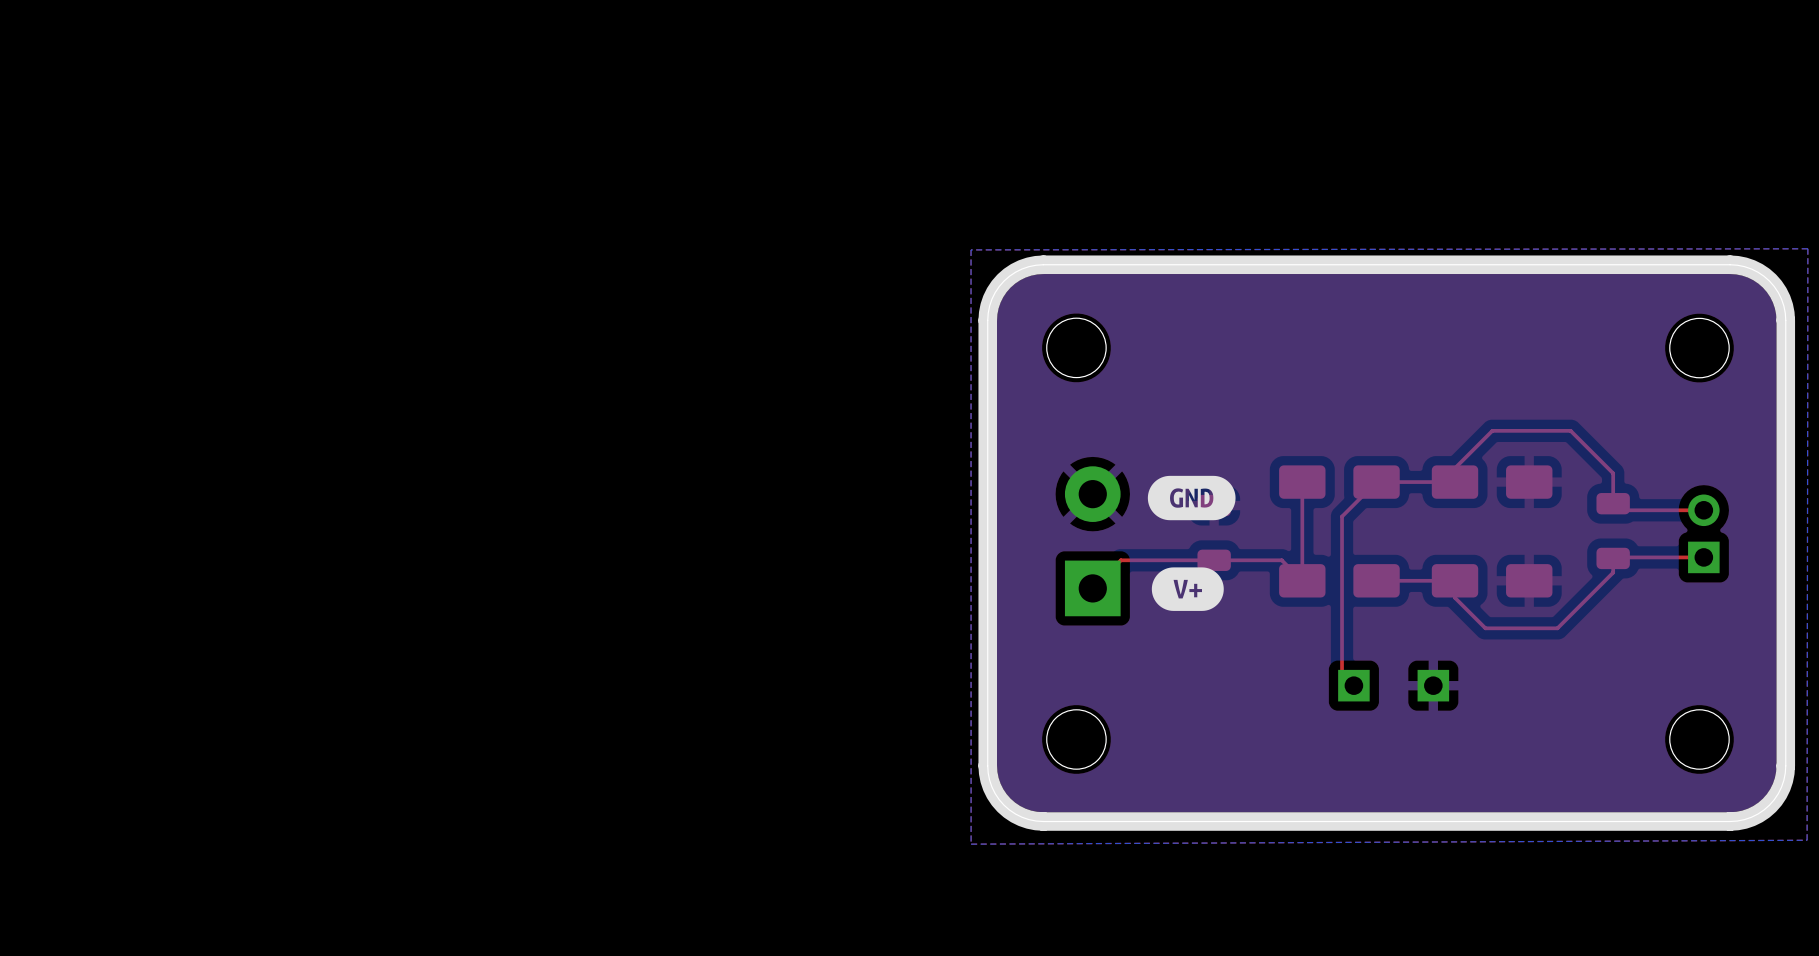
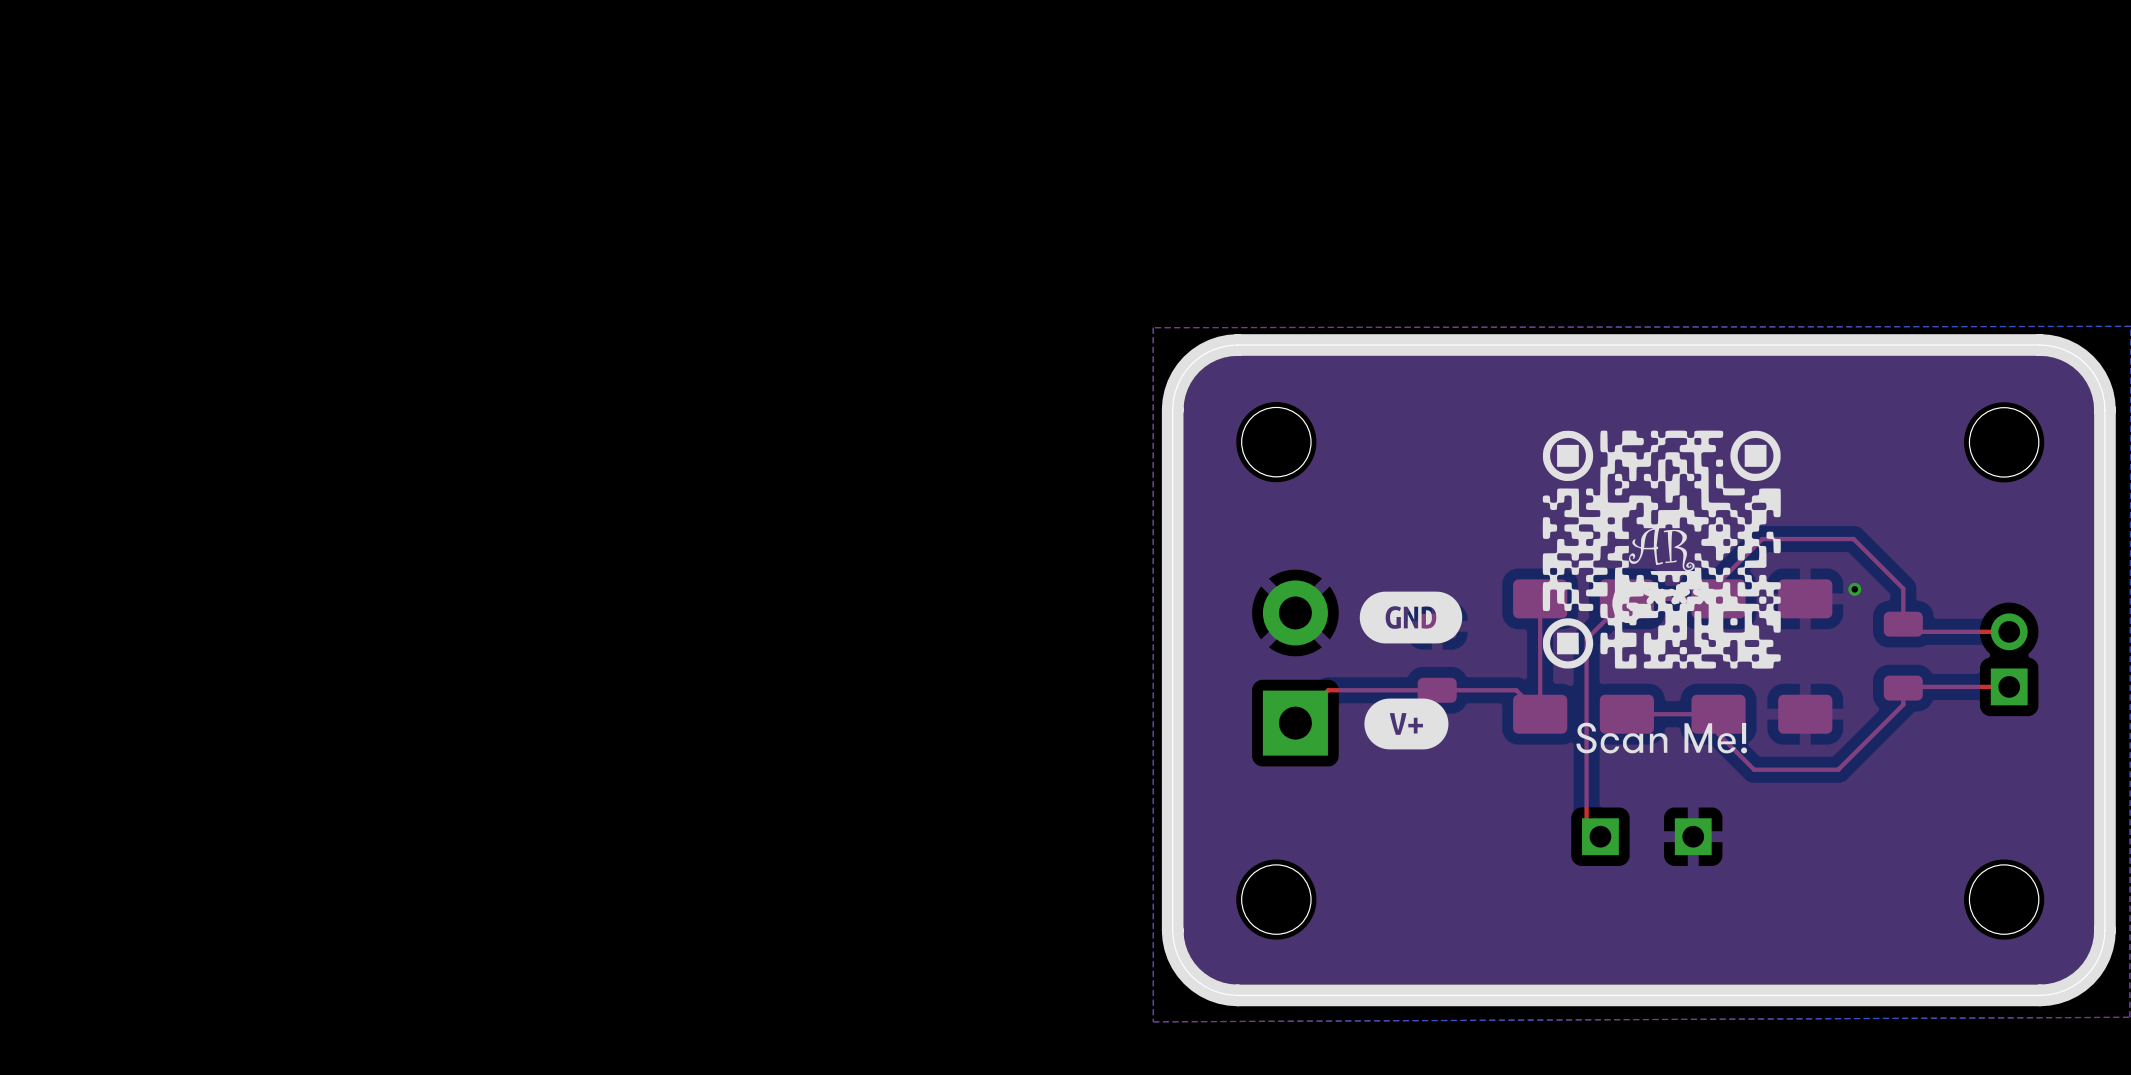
via: none -> (1854, 589)
part: none -> (1661, 592)

